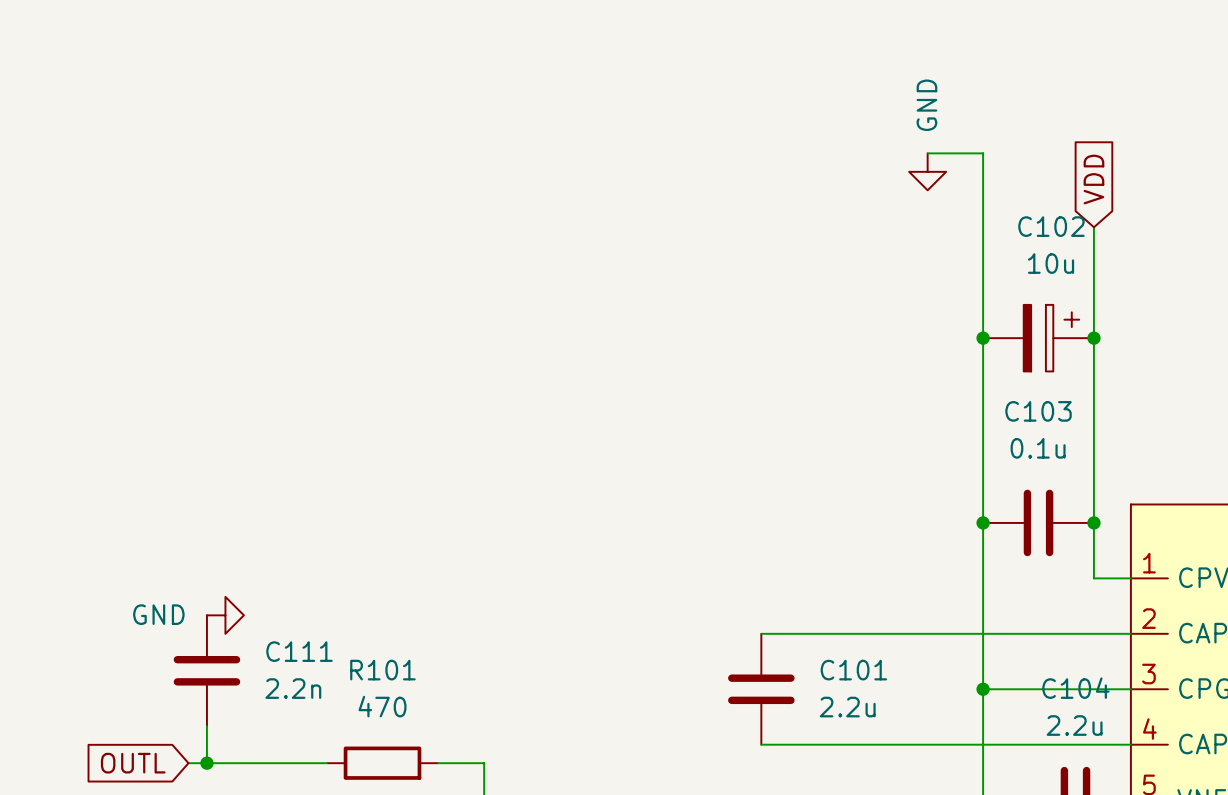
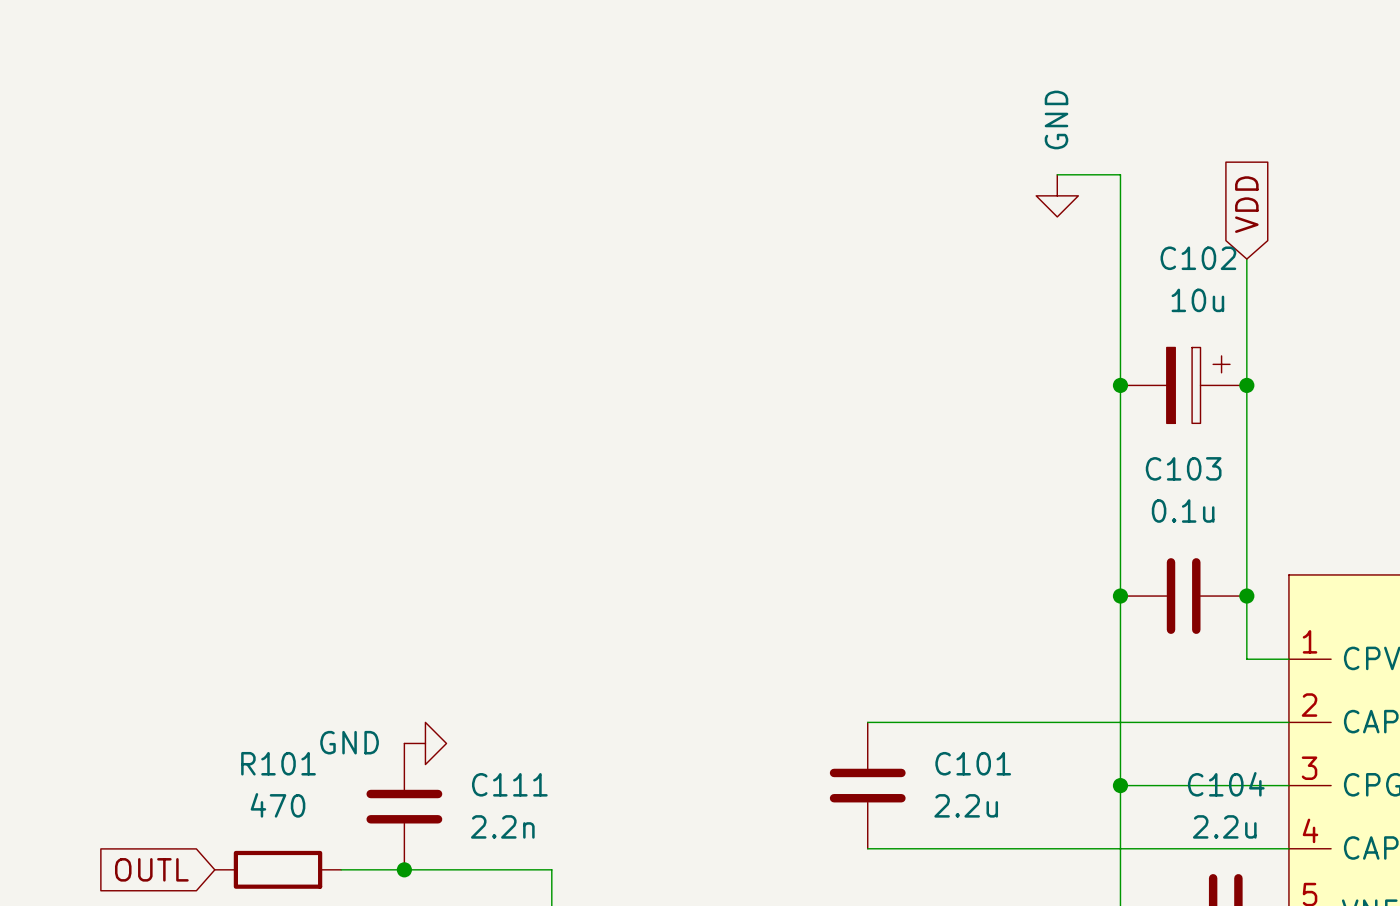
power symbol position: GND (225, 615) -> GND (425, 743)
C111 position: (206, 670) -> (404, 806)
wire: (206, 726) (206, 763) -> none
wire: (188, 763) (299, 763) -> (372, 869) (499, 869)
junction: (206, 763) -> none
junction: none -> (404, 869)
R101 position: (382, 763) -> (278, 869)

